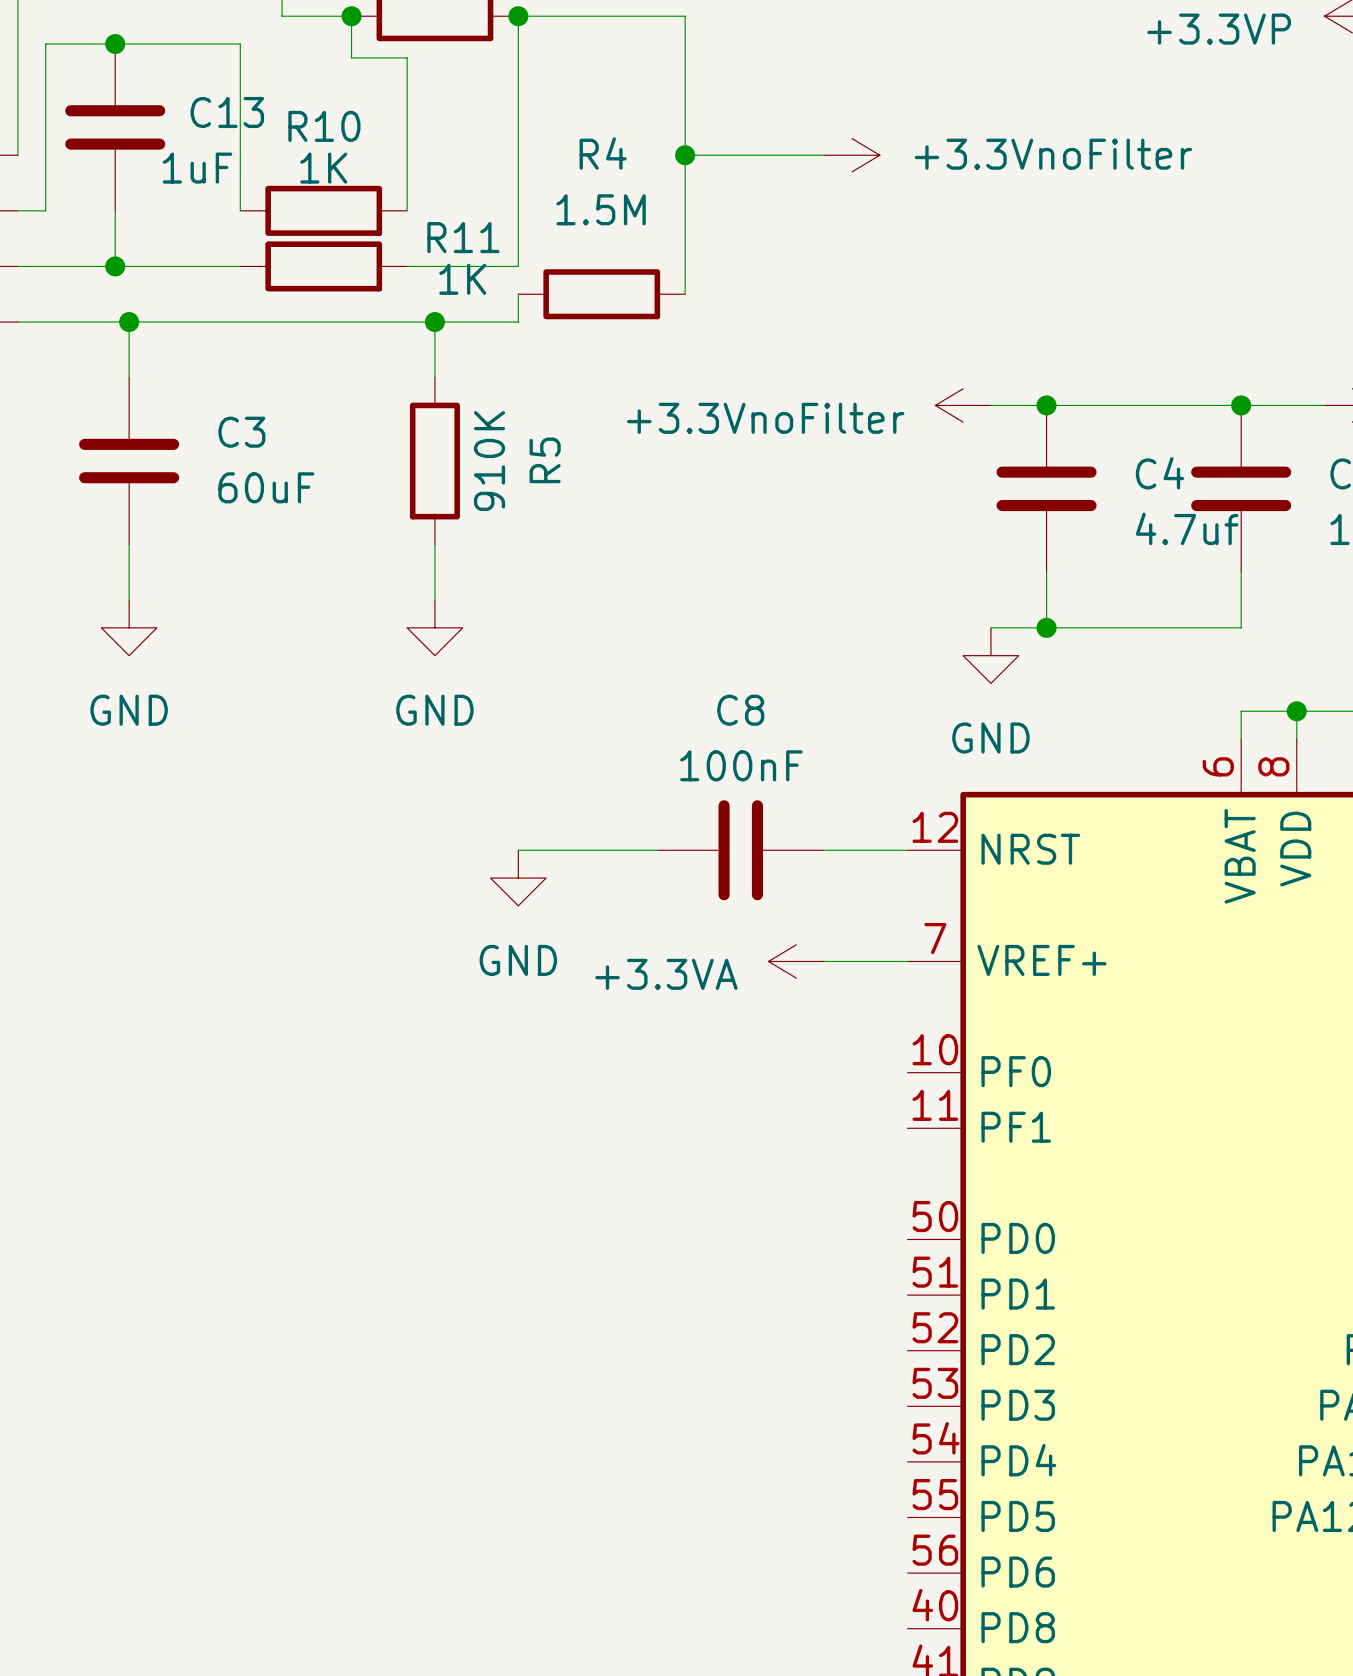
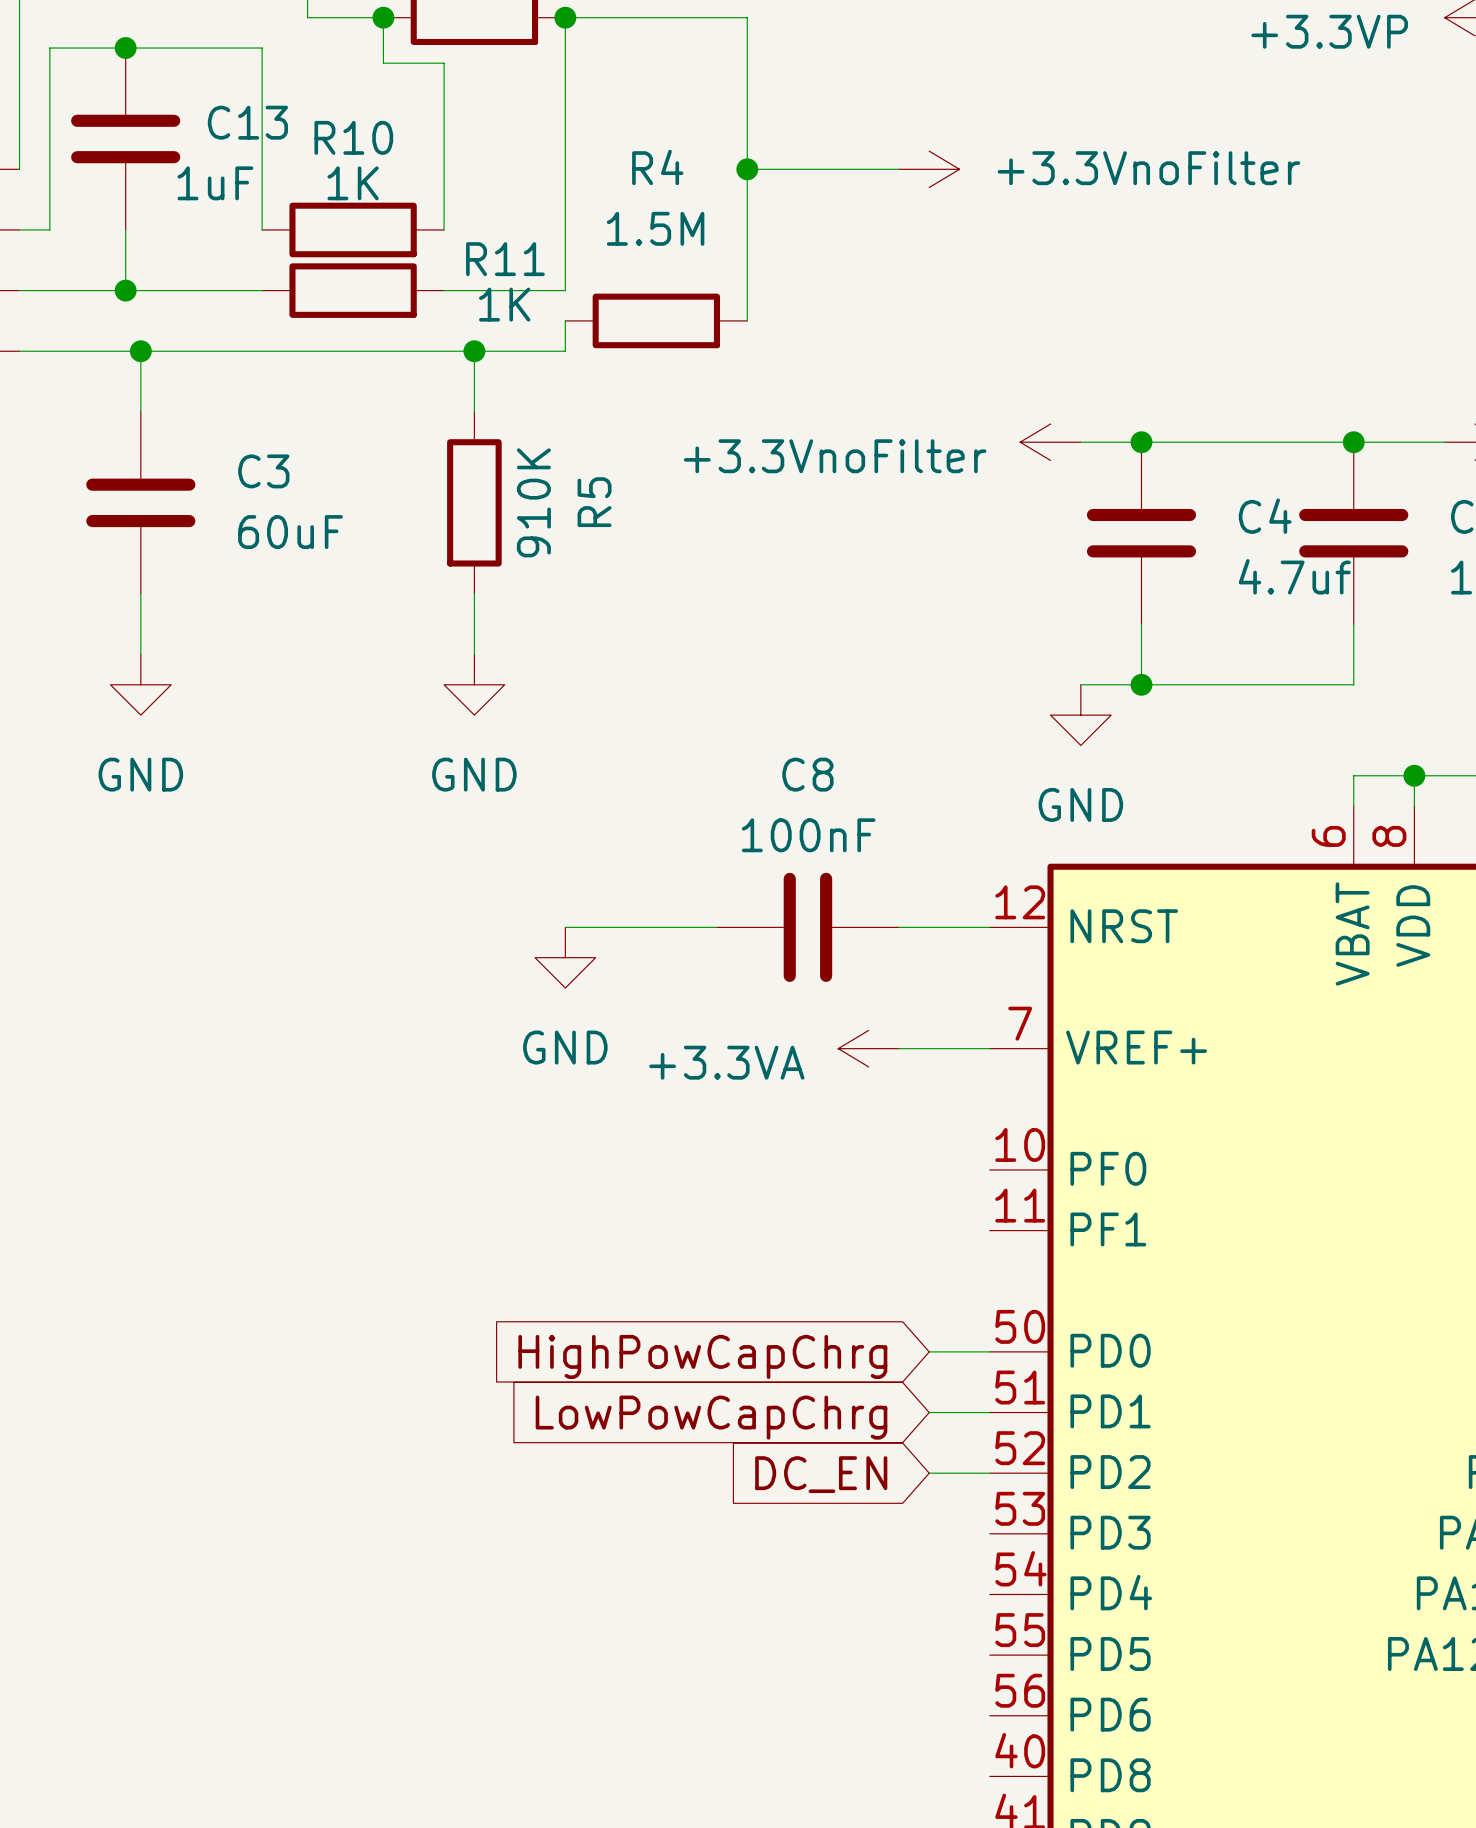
wire: none -> (929, 1351) (989, 1351)
global label: none -> HighPowCapChrg (702, 1356)
wire: none -> (929, 1412) (989, 1412)
global label: none -> LowPowCapChrg (711, 1417)
wire: none -> (929, 1473) (989, 1473)
global label: none -> DC_EN (821, 1474)

